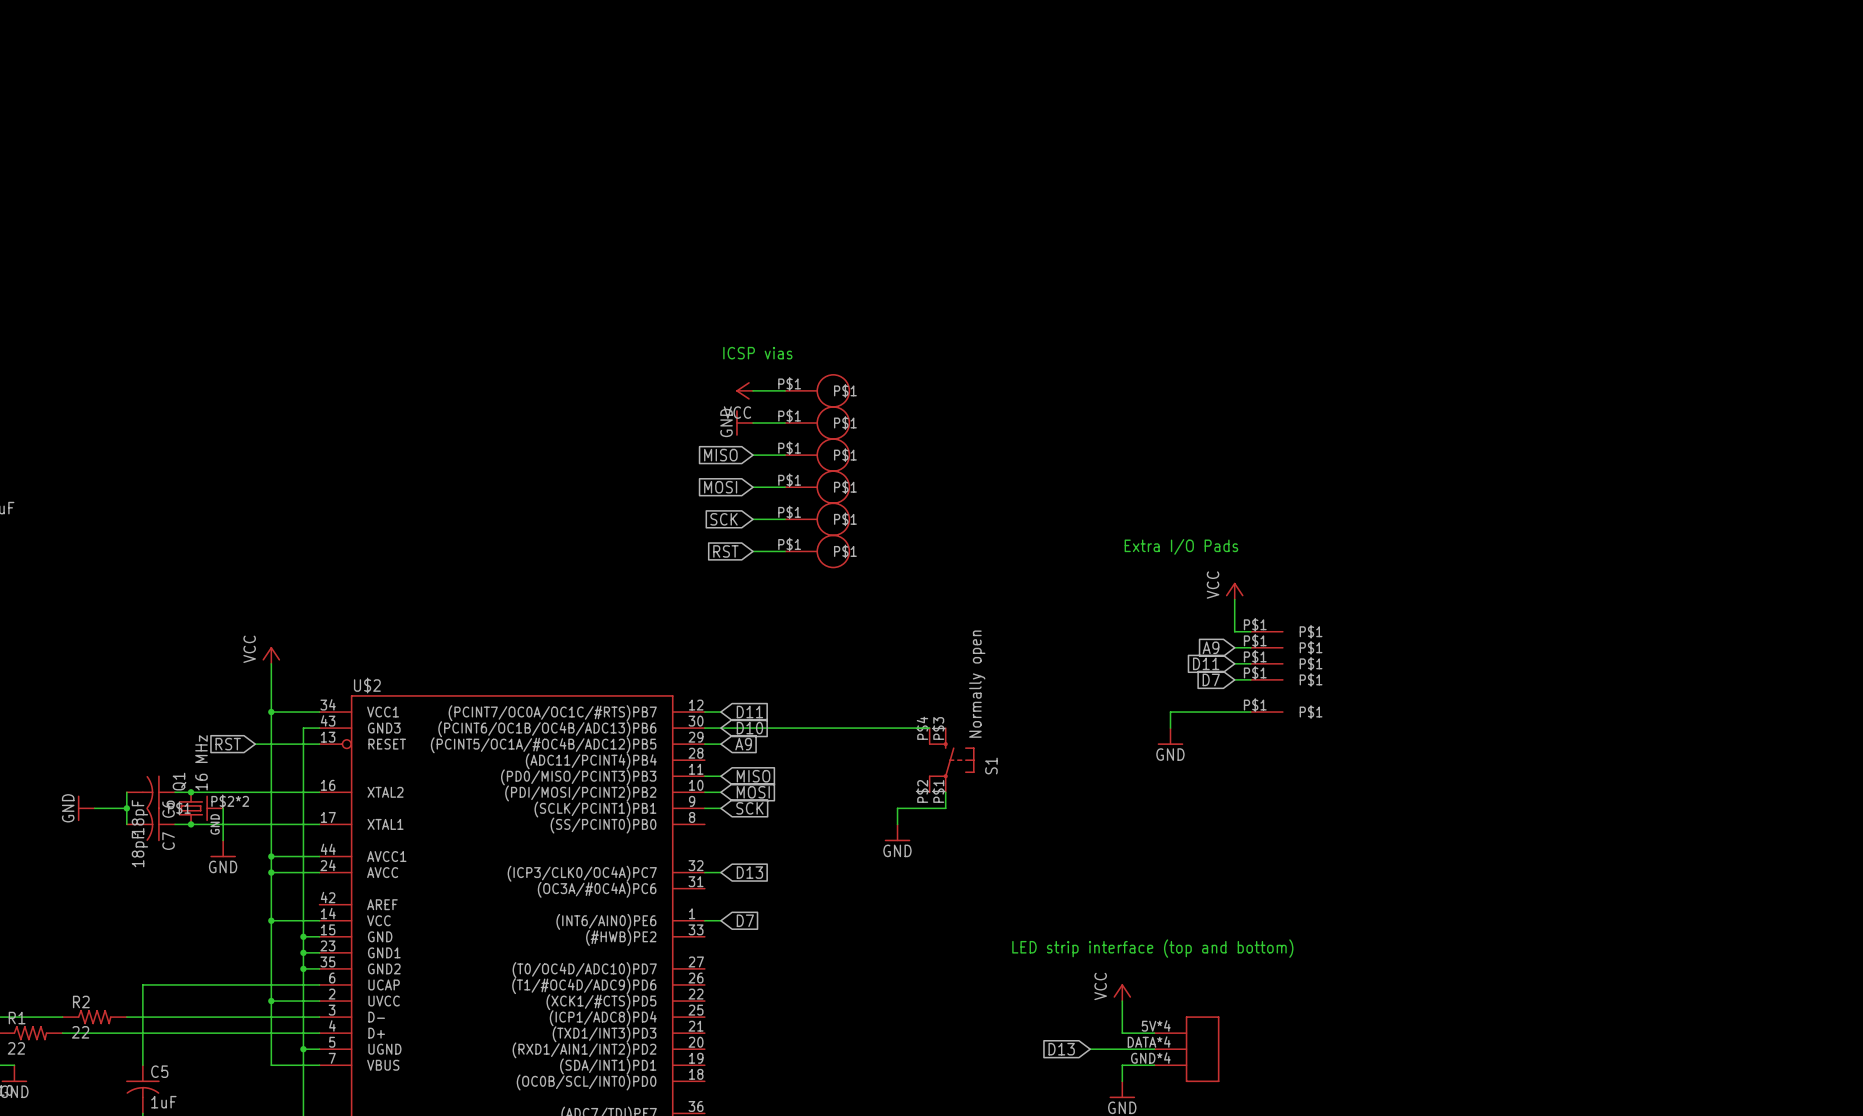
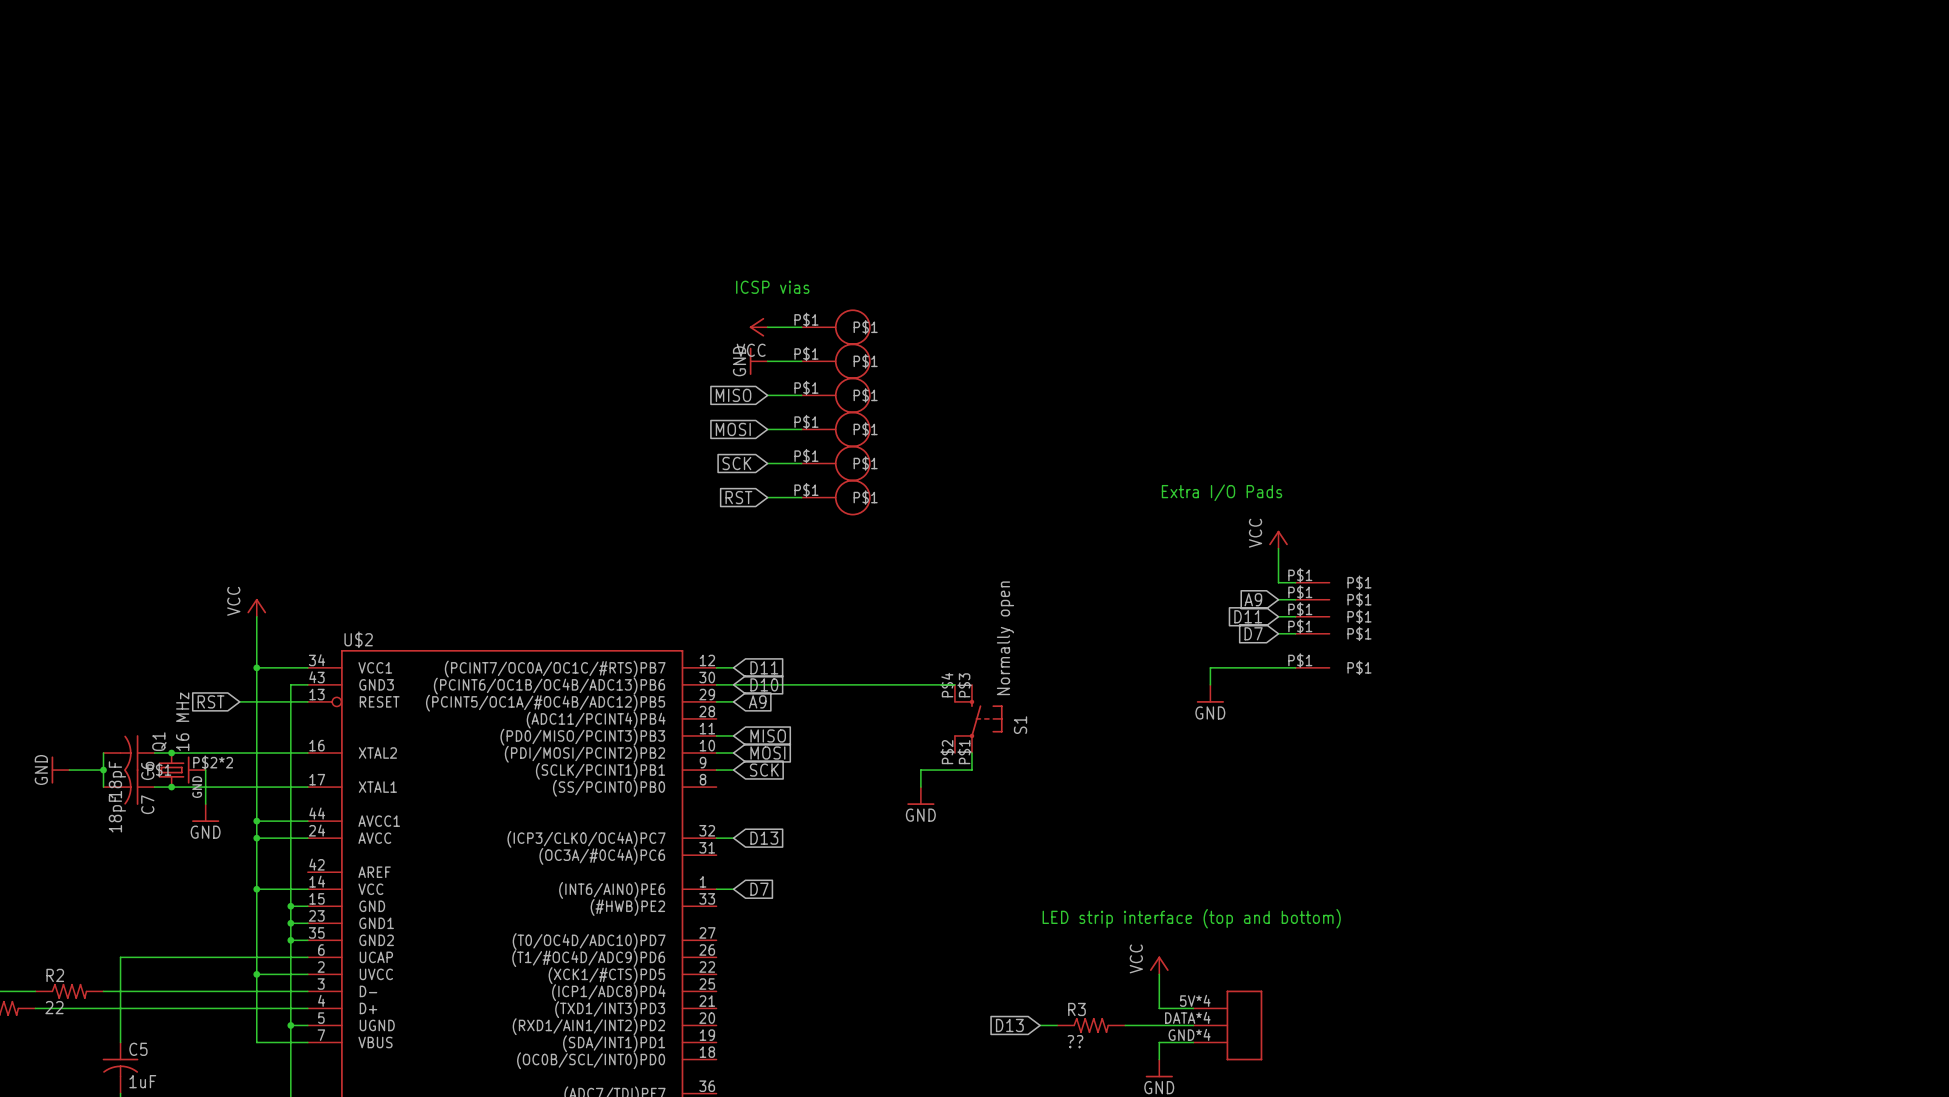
wire: none -> (1040, 1025) (1057, 1025)
R3: none -> ?? (1091, 1025)
global label position: D13 (1061, 1049) -> D13 (1009, 1025)

